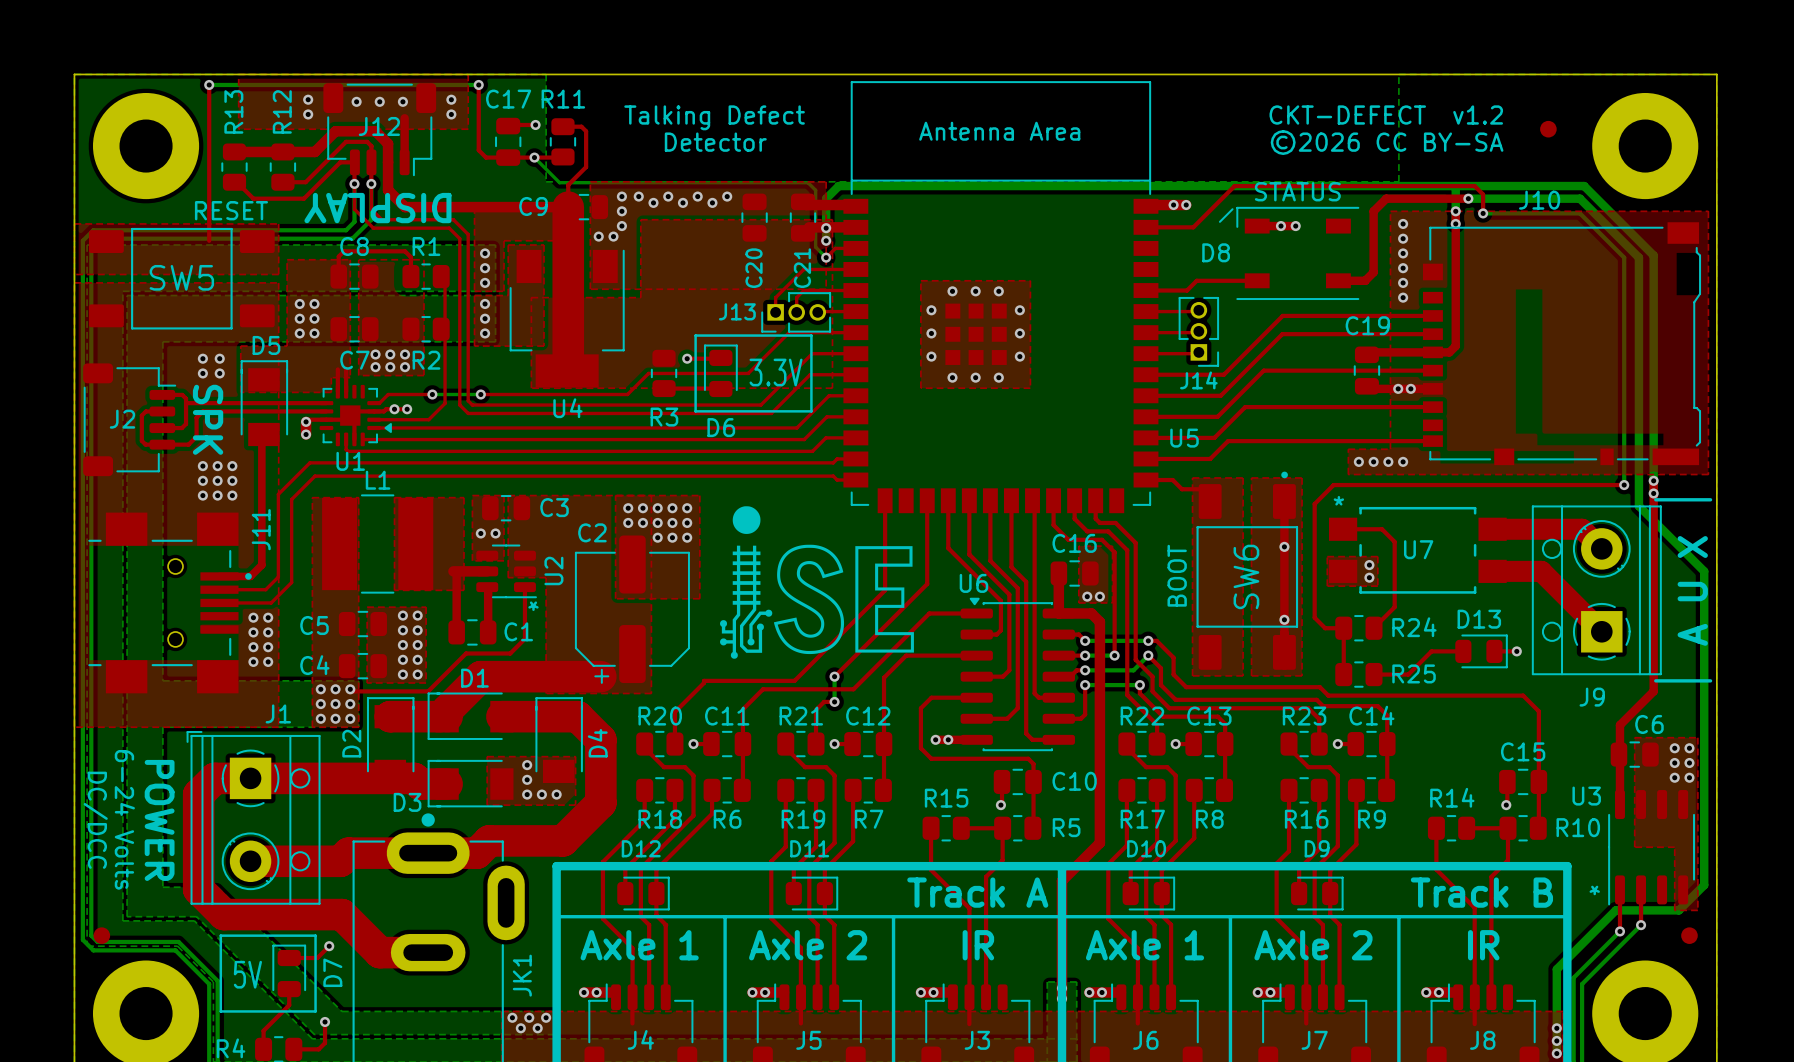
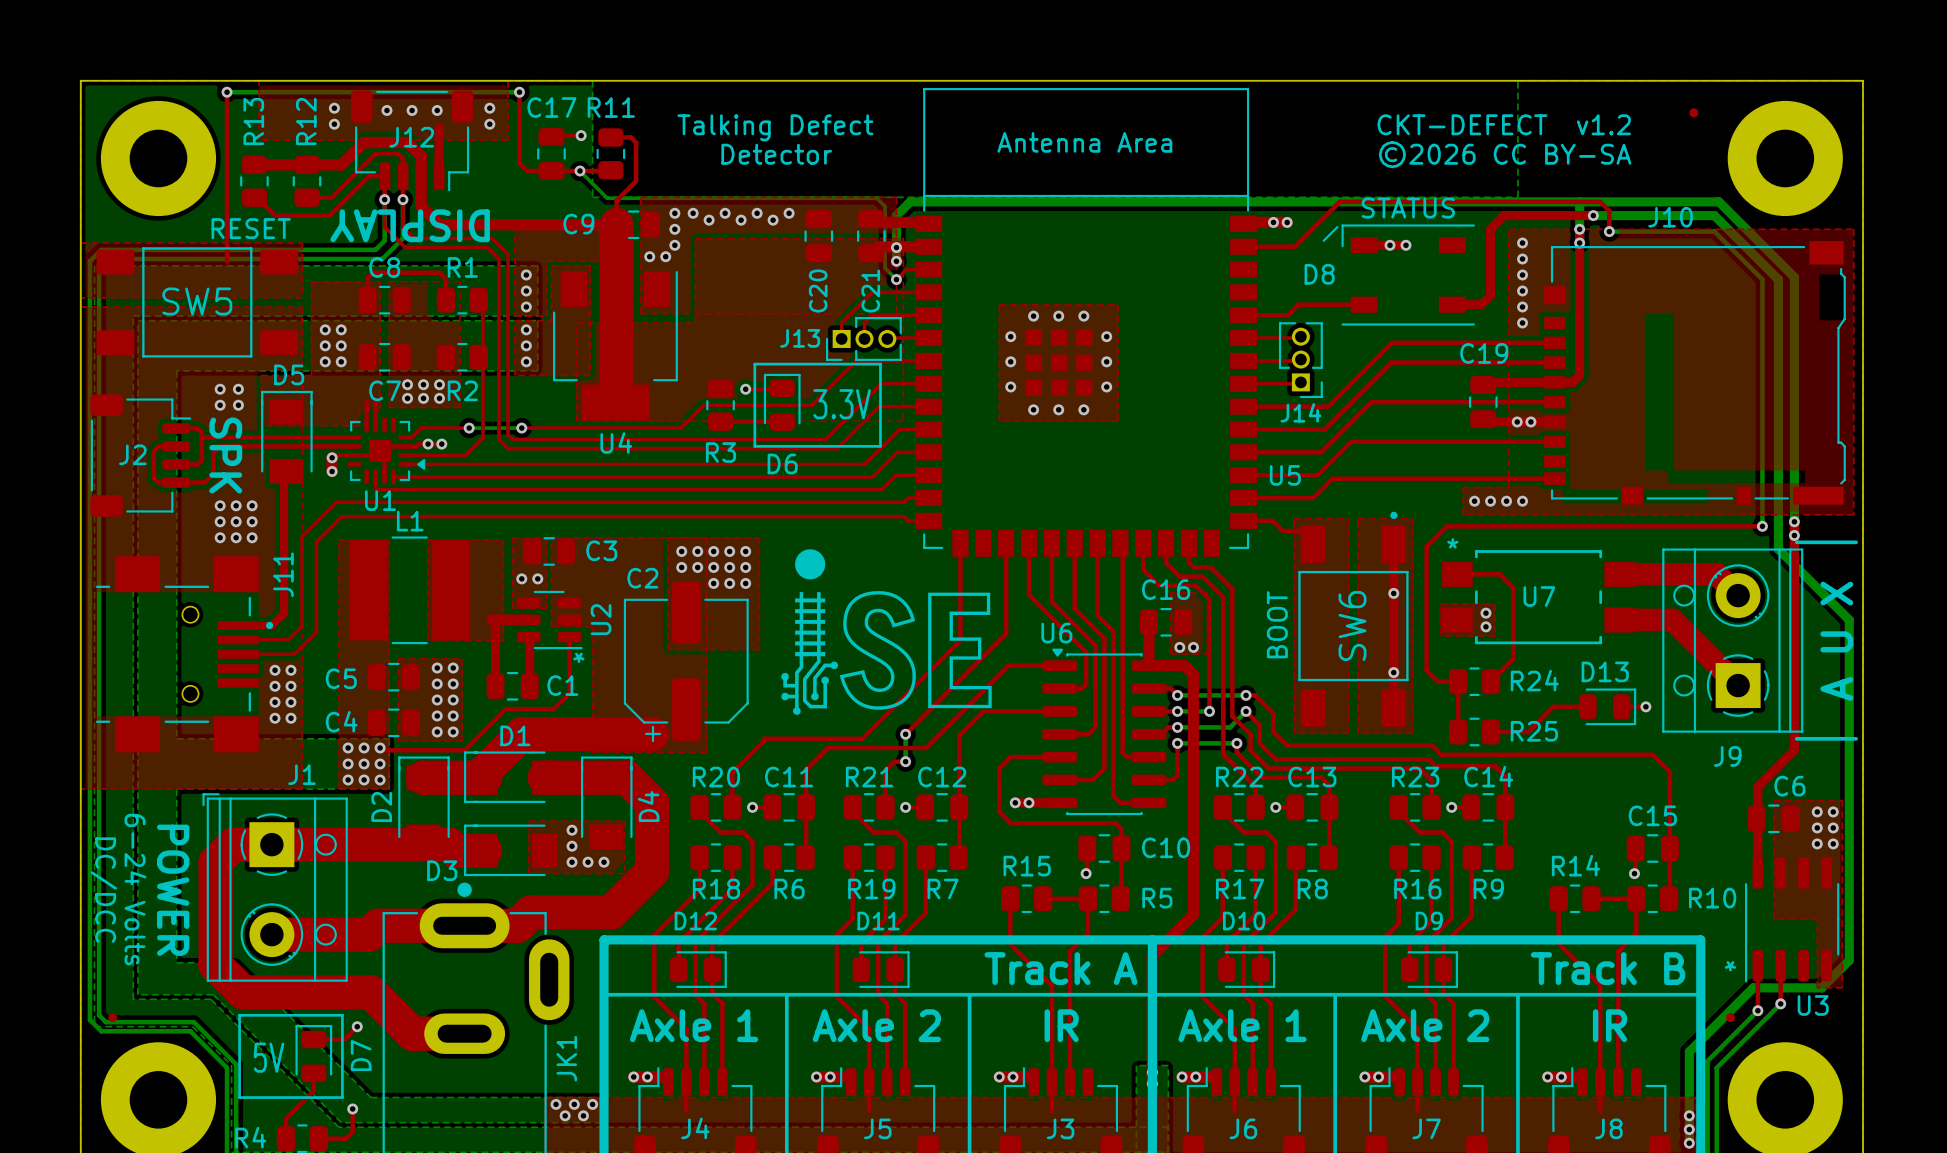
part: none -> (1693, 112)
part: (1548, 129) -> none
U3 name position: U3 (1586, 796) -> U3 (1813, 1005)
part footprint: [93, 927, 111, 944] -> [108, 1013, 118, 1023]
part: (1689, 935) -> none
part: none -> (1730, 1017)

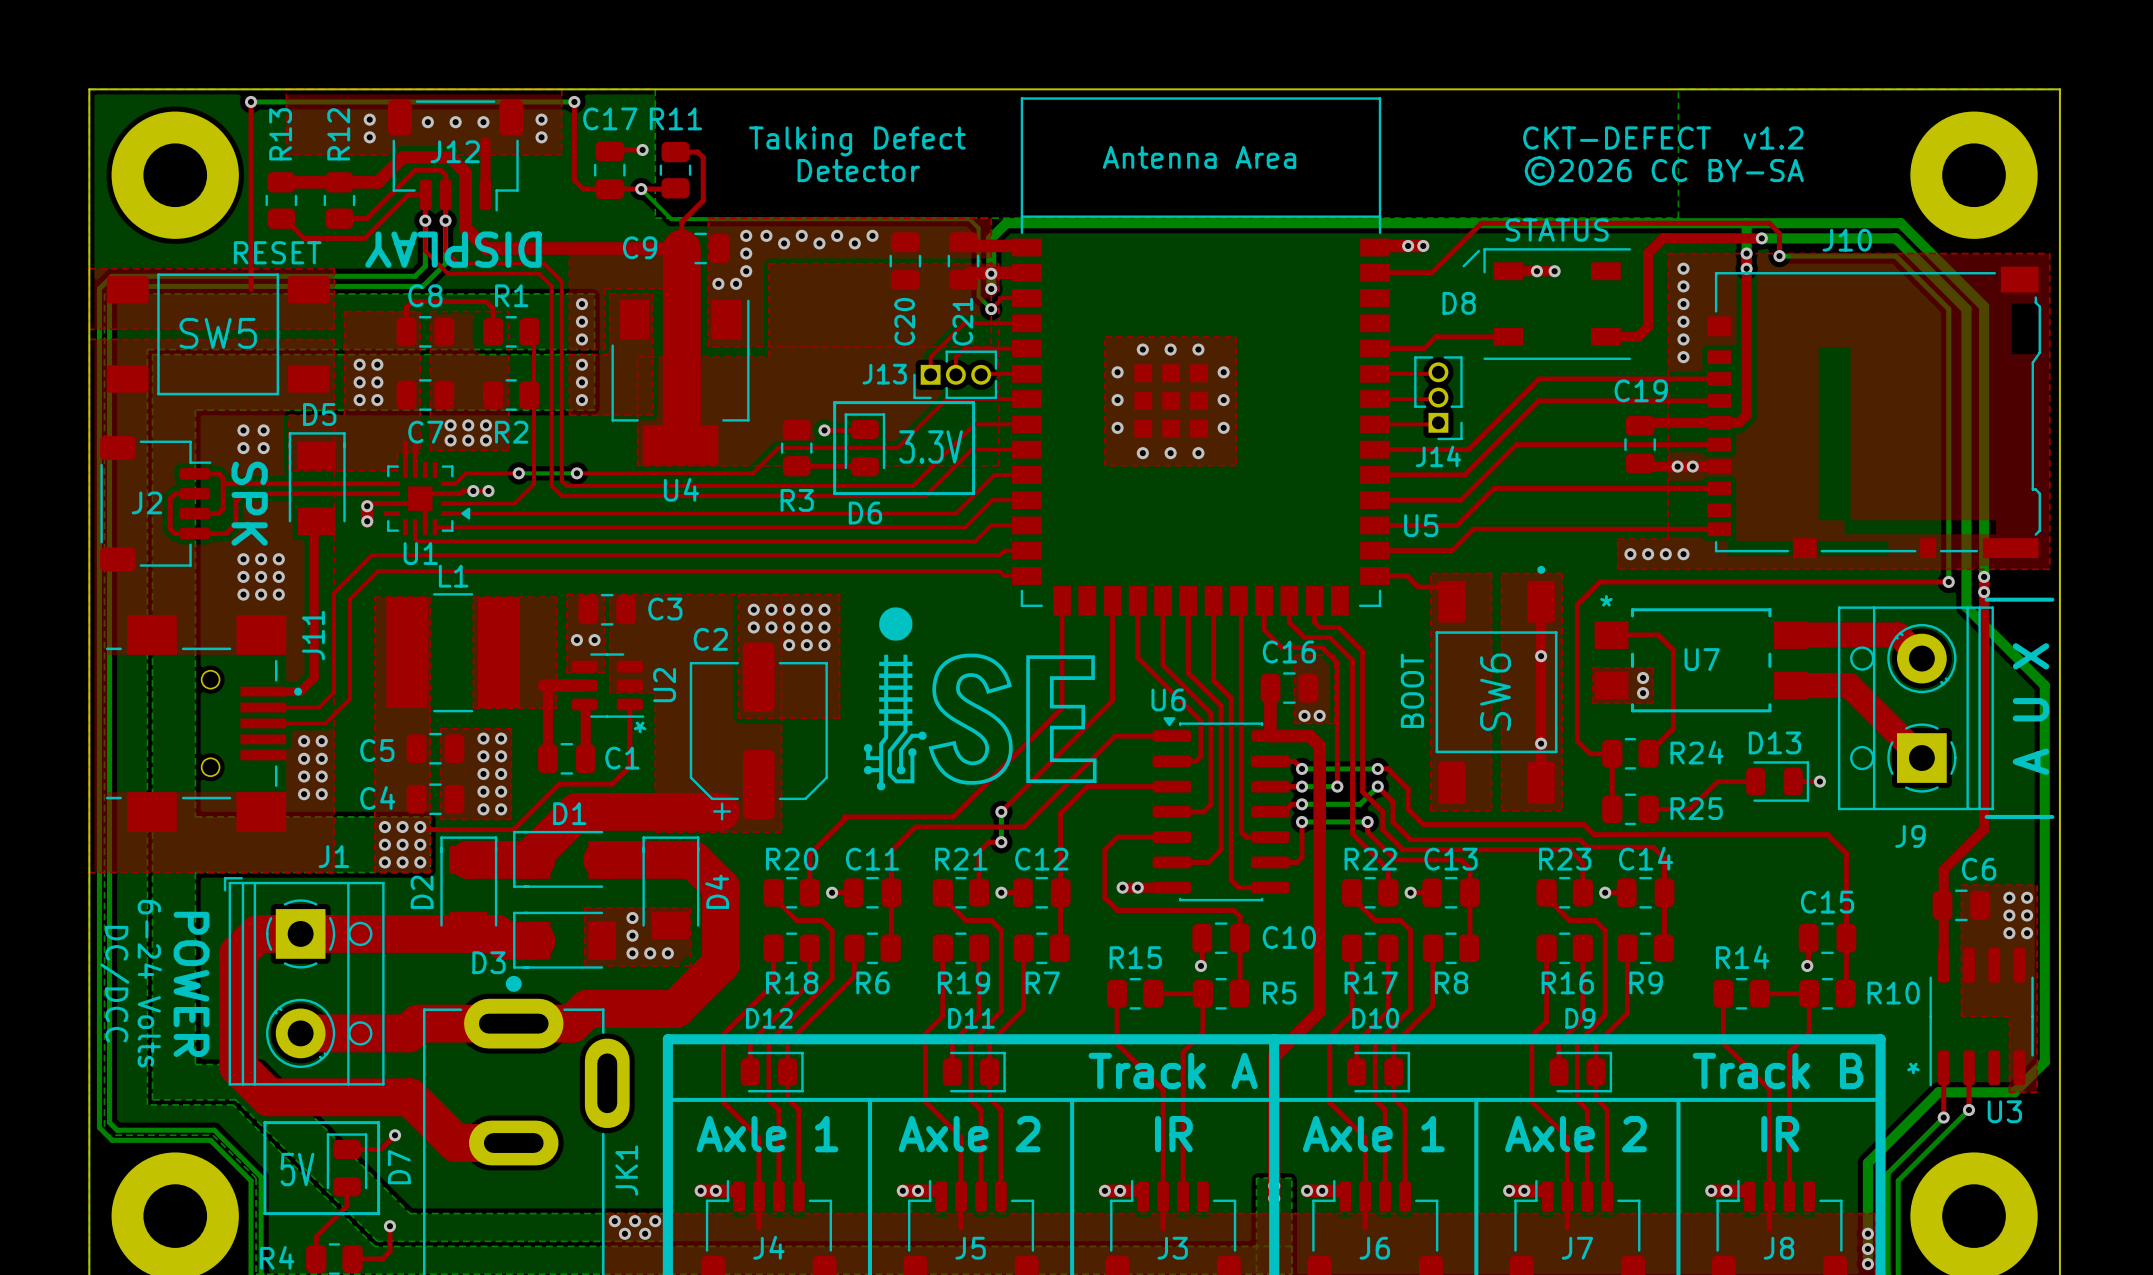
part: (1693, 112) -> none
part: (112, 1017) -> none
part: (1730, 1017) -> none

